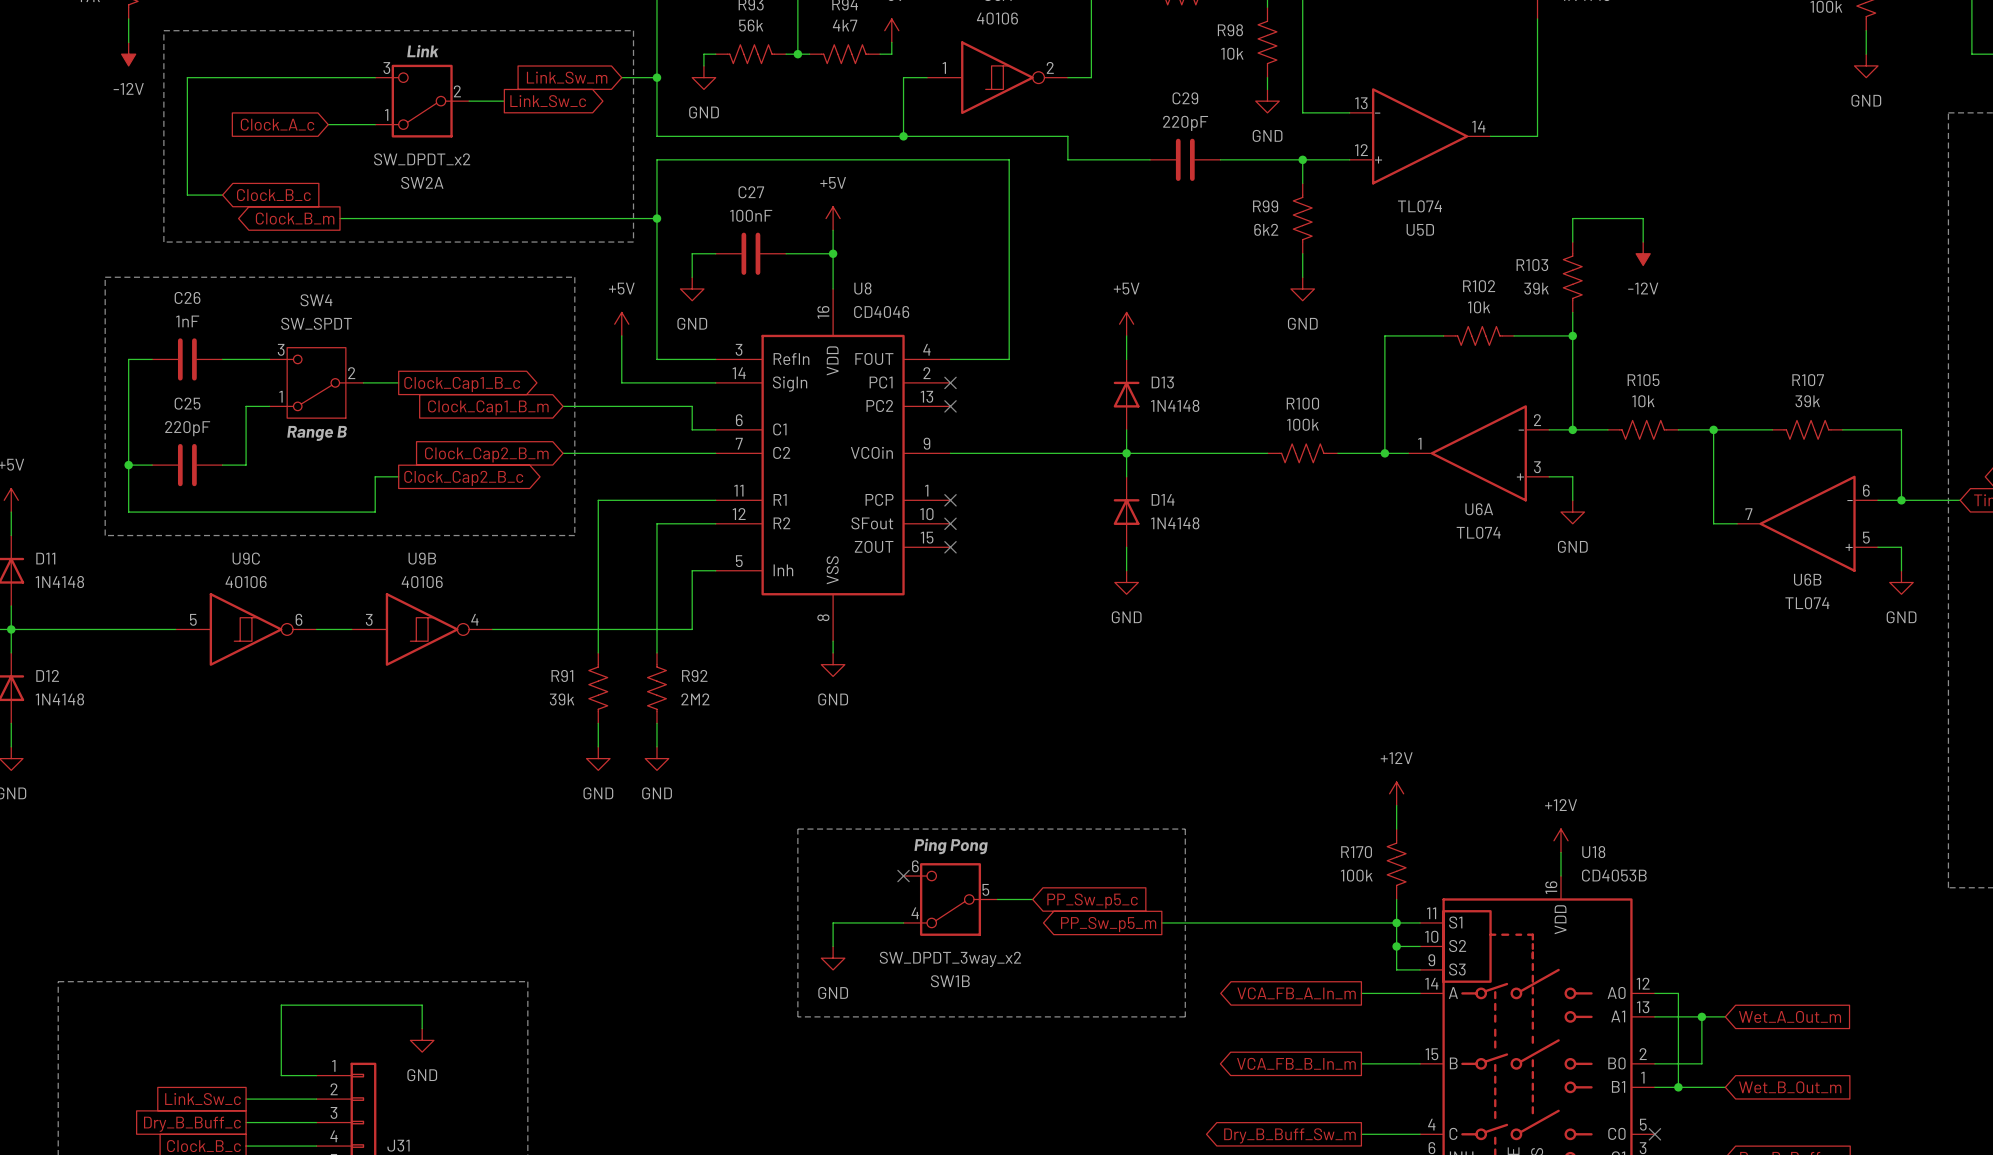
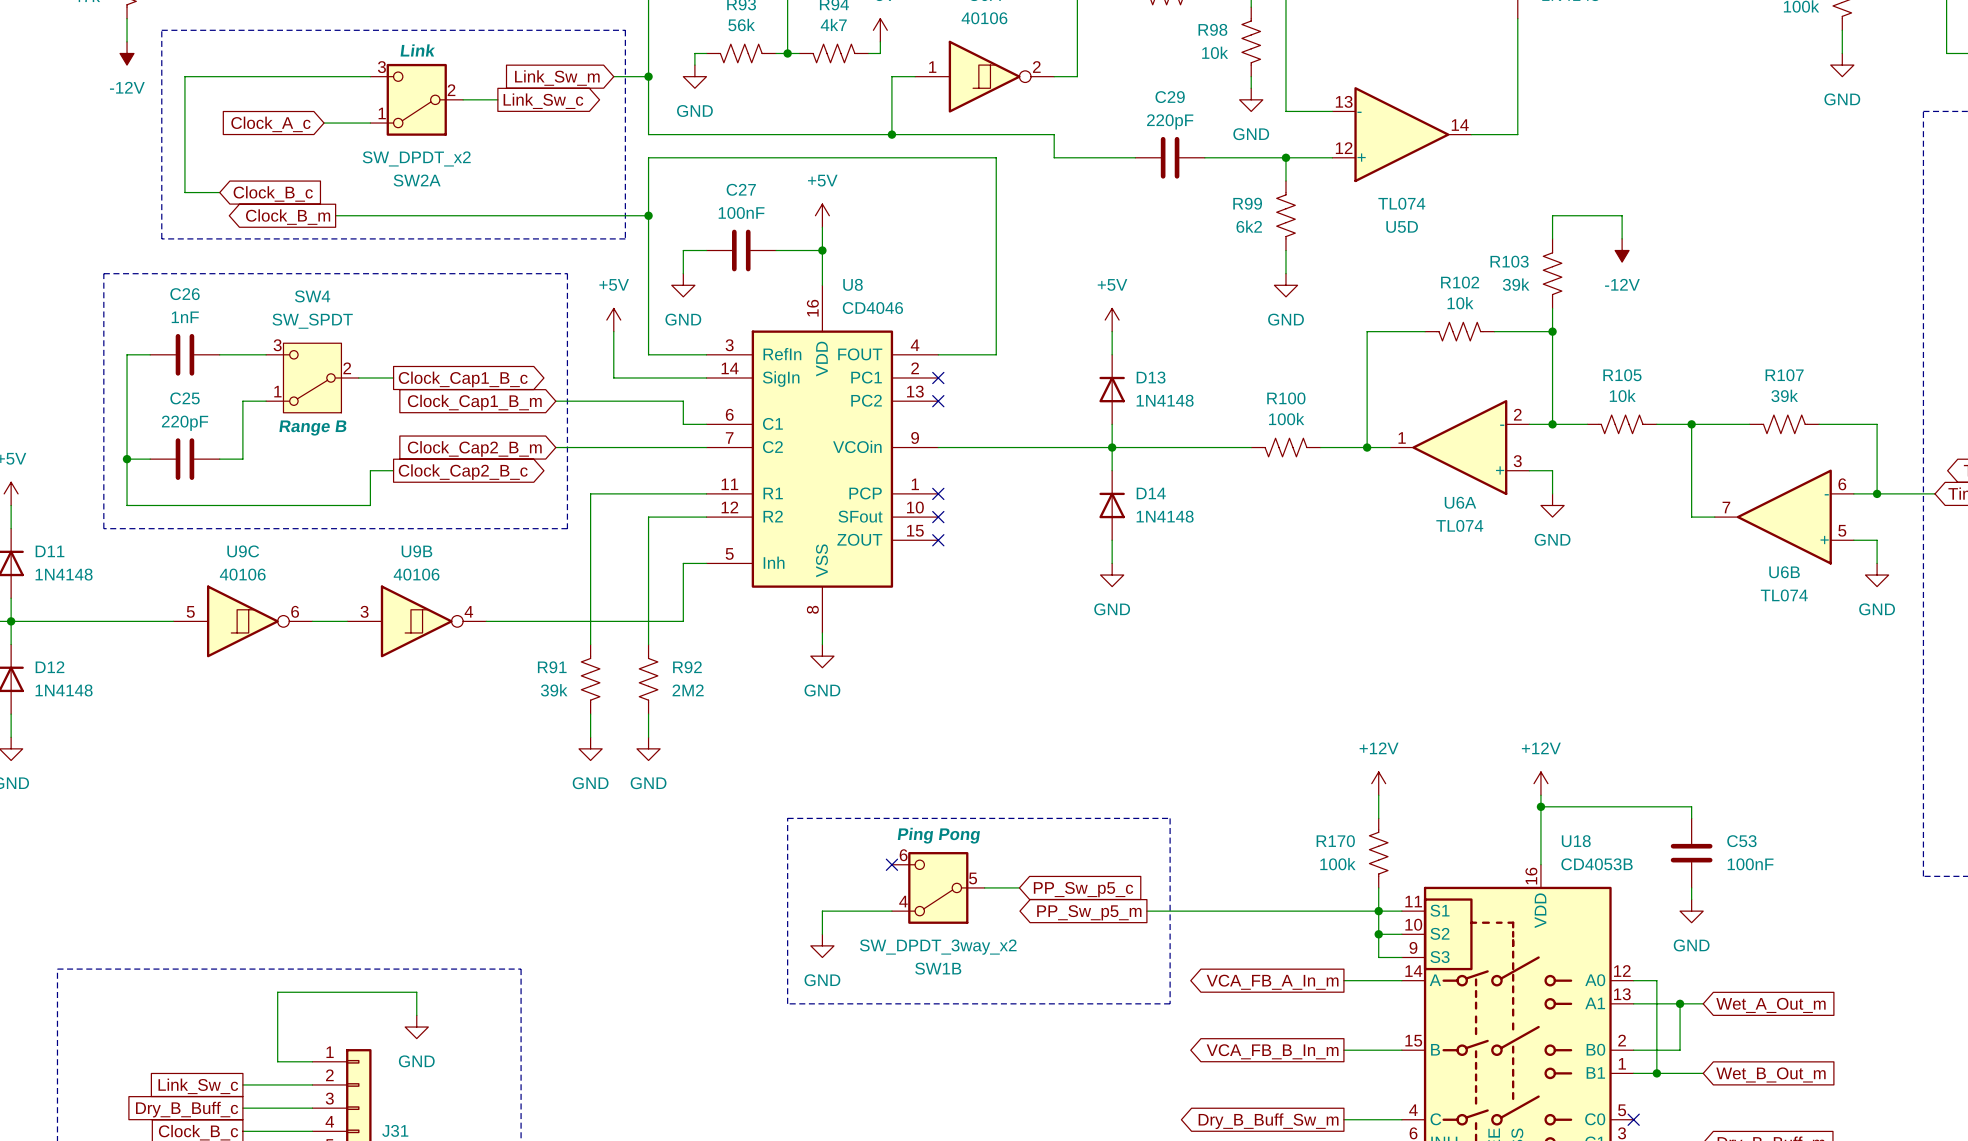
wire: none -> (1540, 806) (1691, 806) (1691, 818)
junction: none -> (1540, 806)
power symbol position: +12V (1561, 840) -> +12V (1540, 783)
C53: none -> 100nF (1691, 853)
wire: none -> (1691, 887) (1691, 899)
power symbol: none -> GND (1691, 911)

